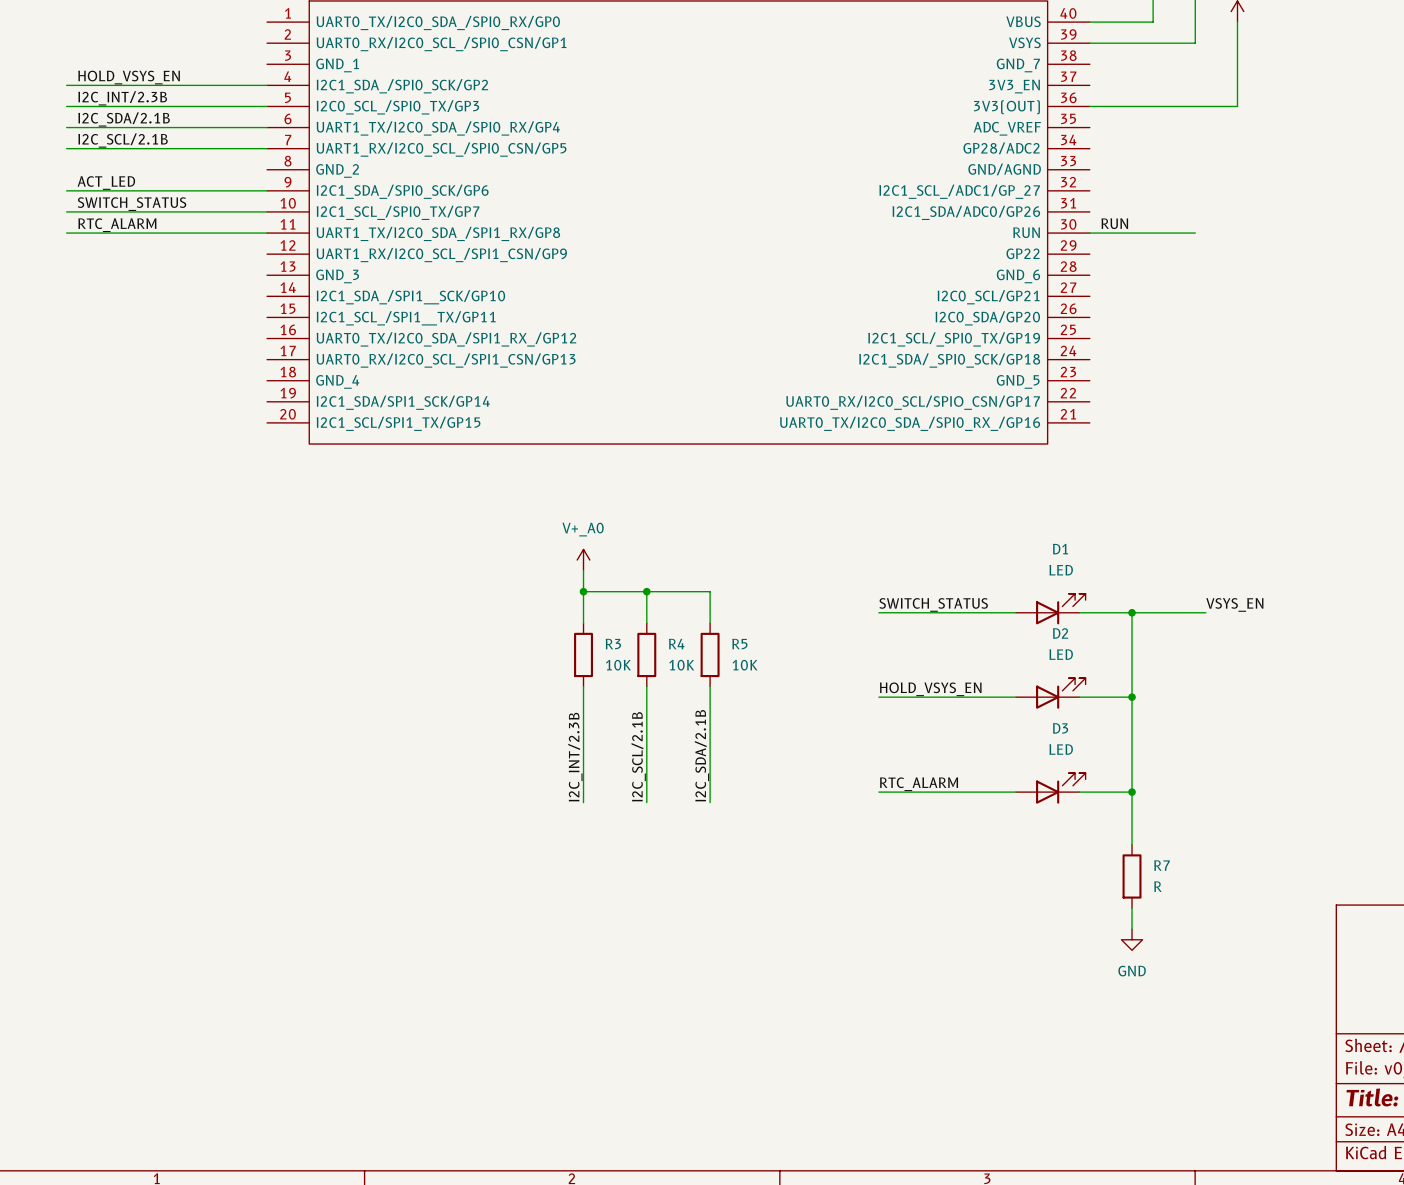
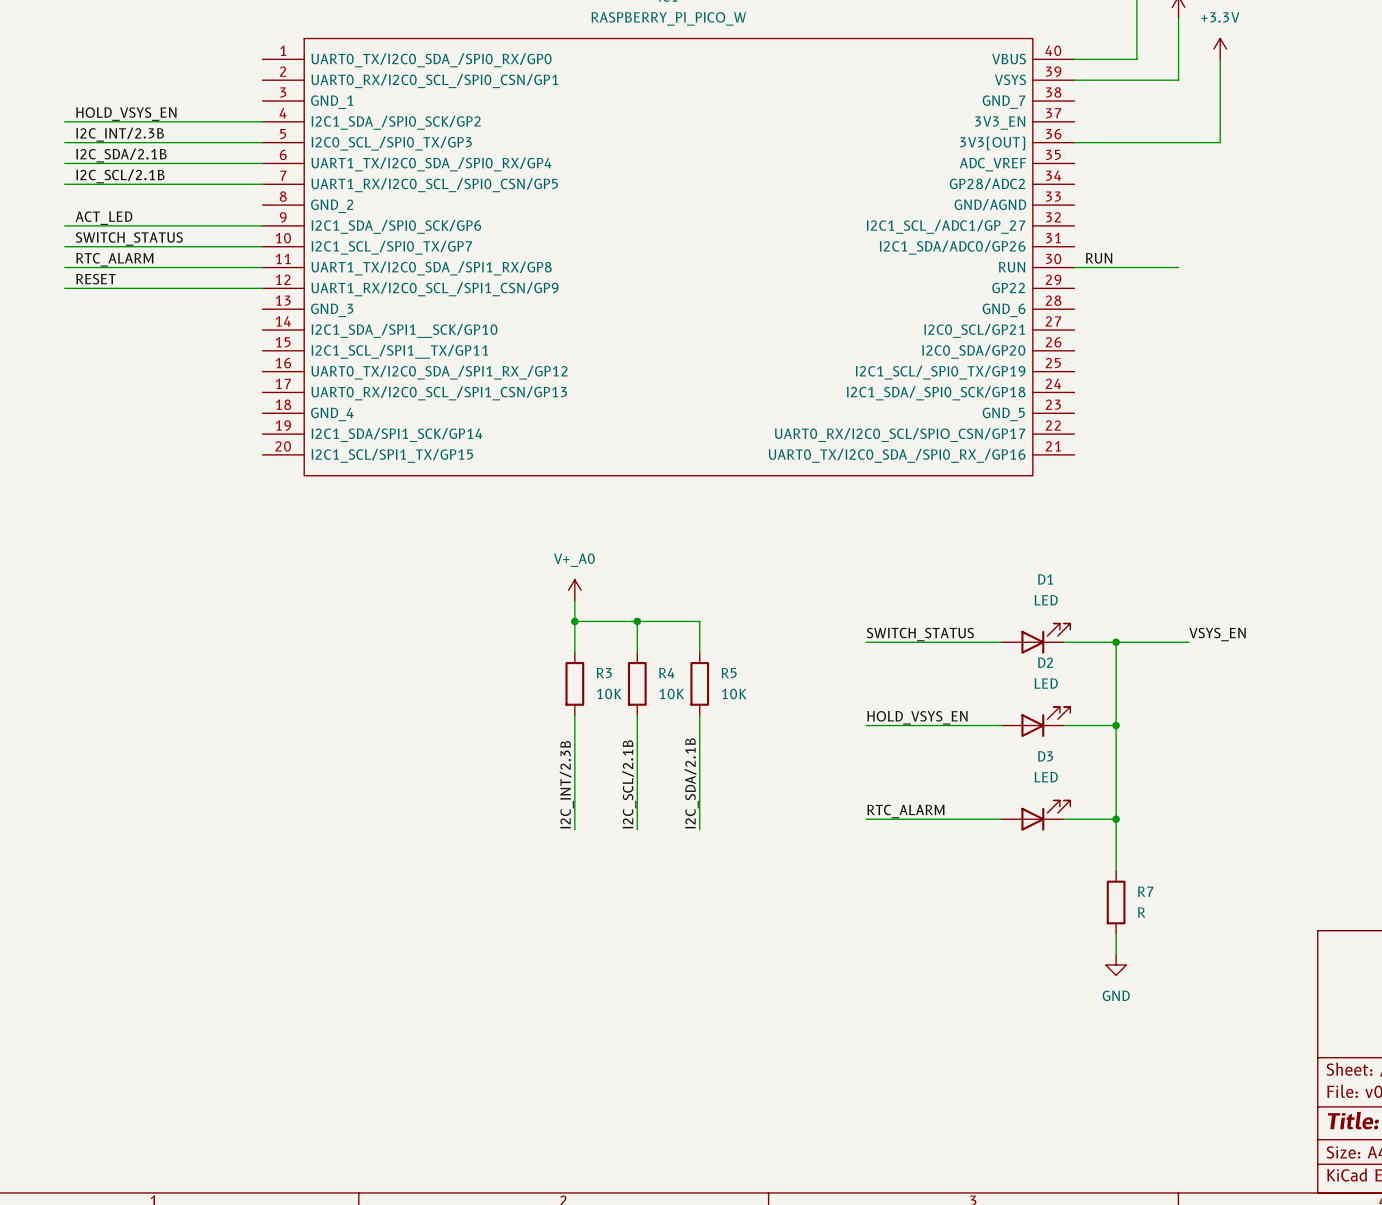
label: none -> RESET (95, 279)
wire: none -> (64, 288) (262, 288)

